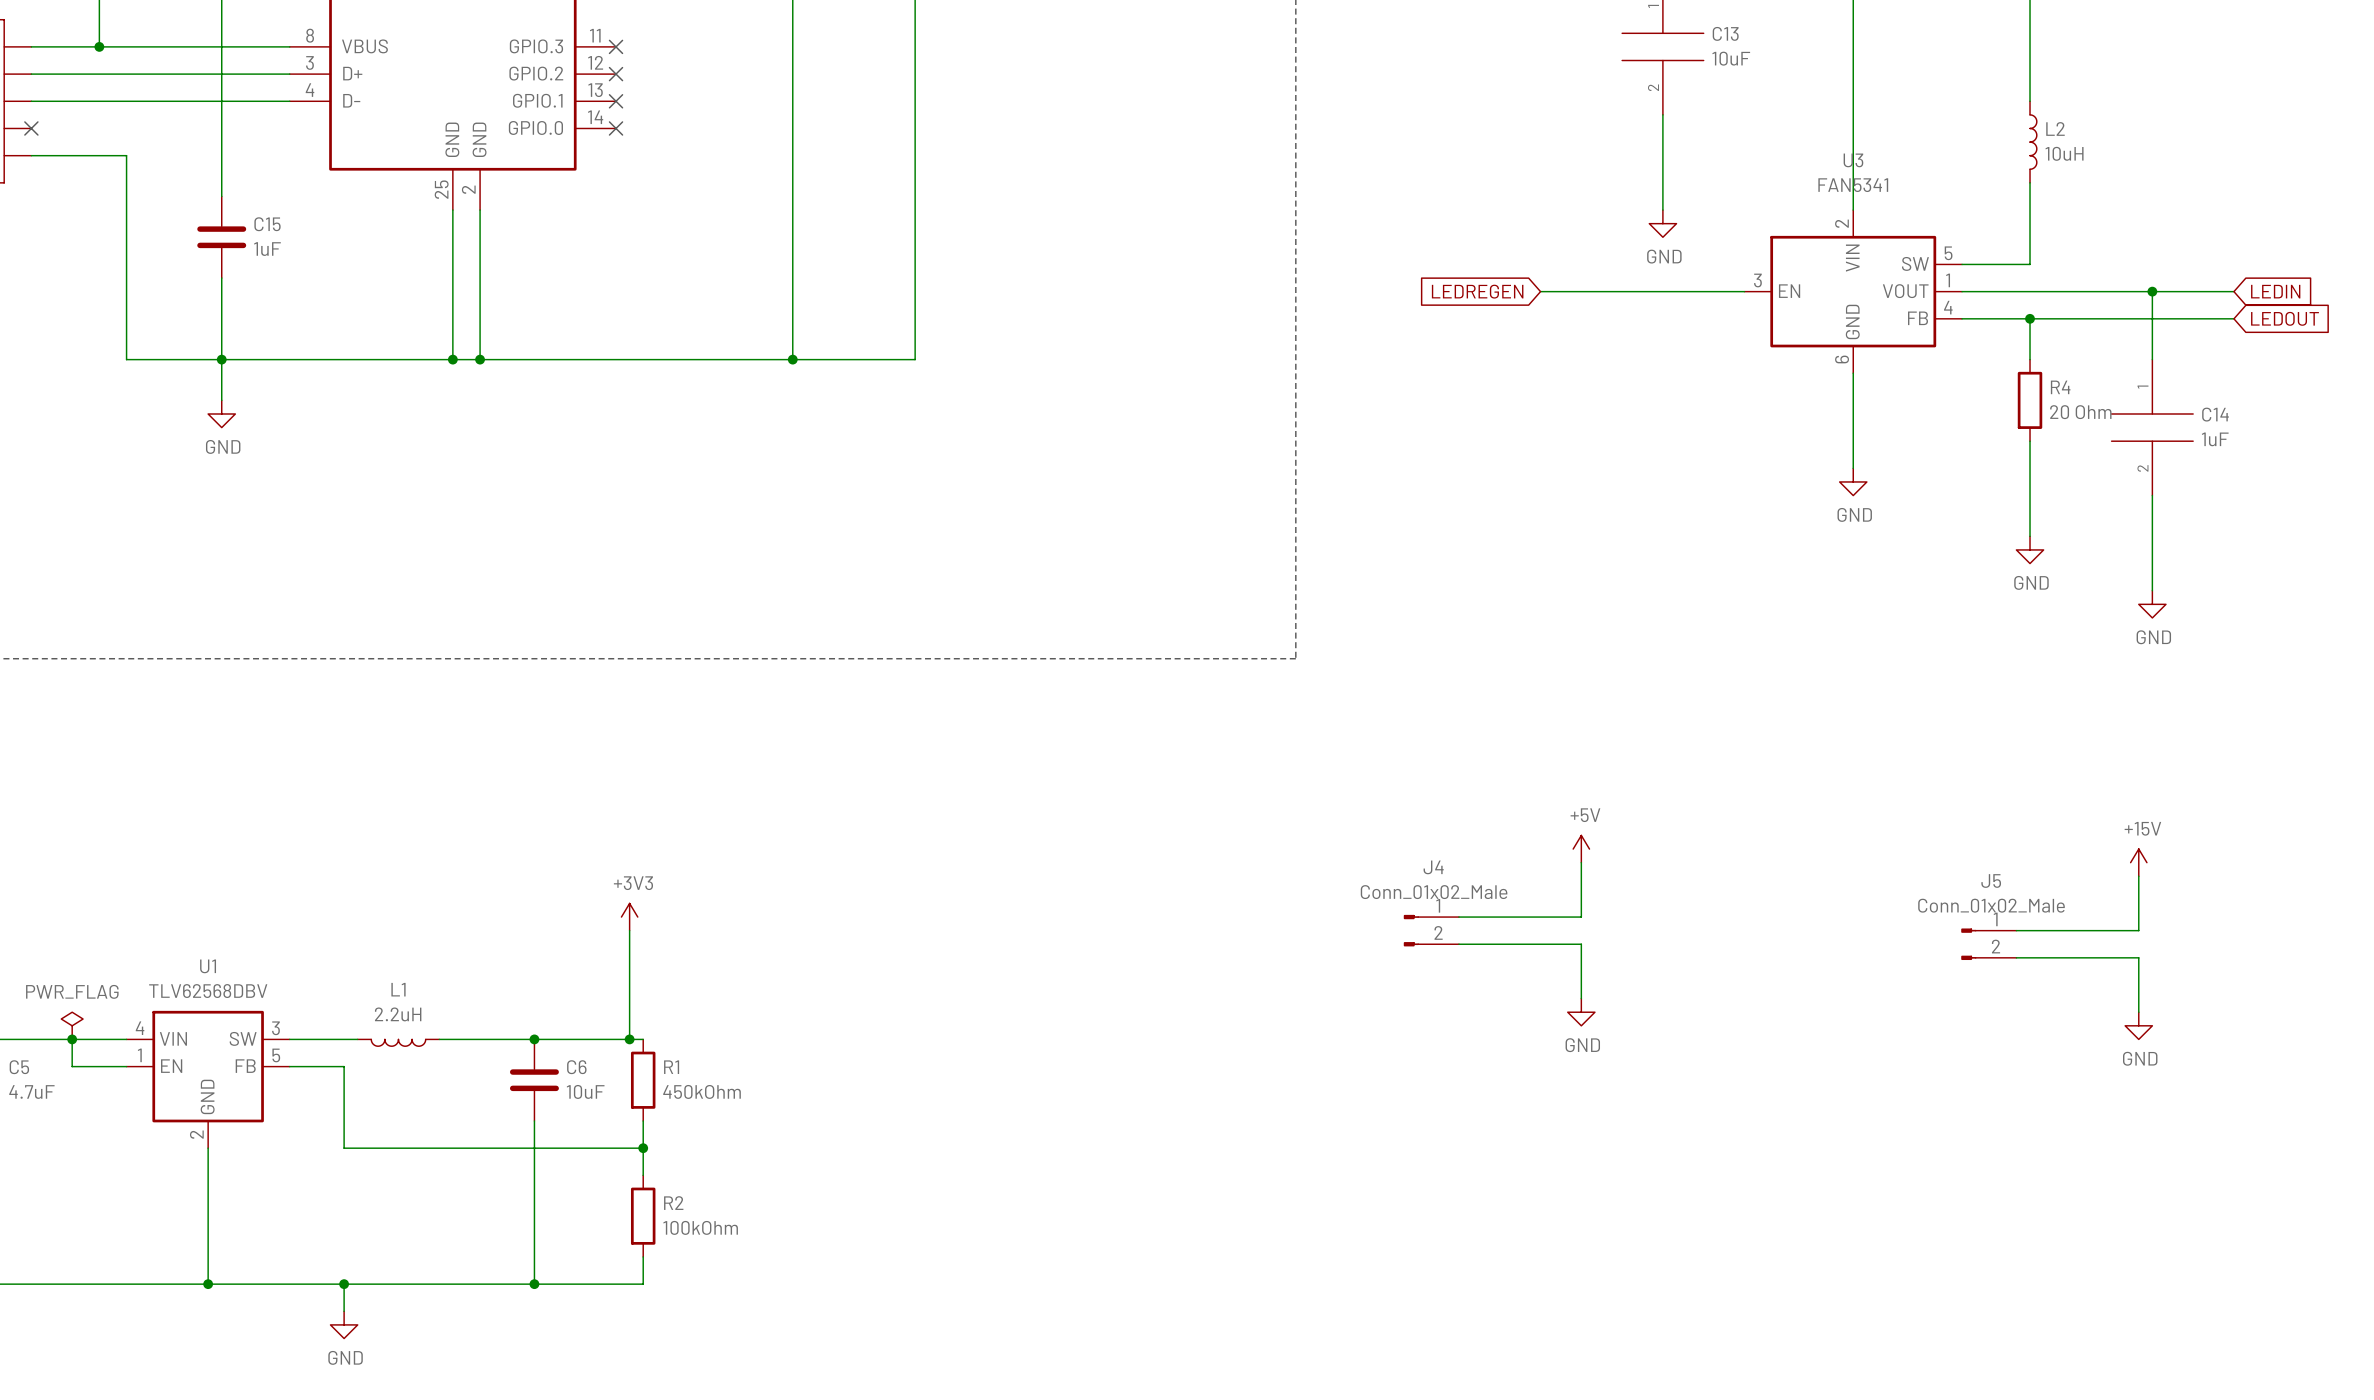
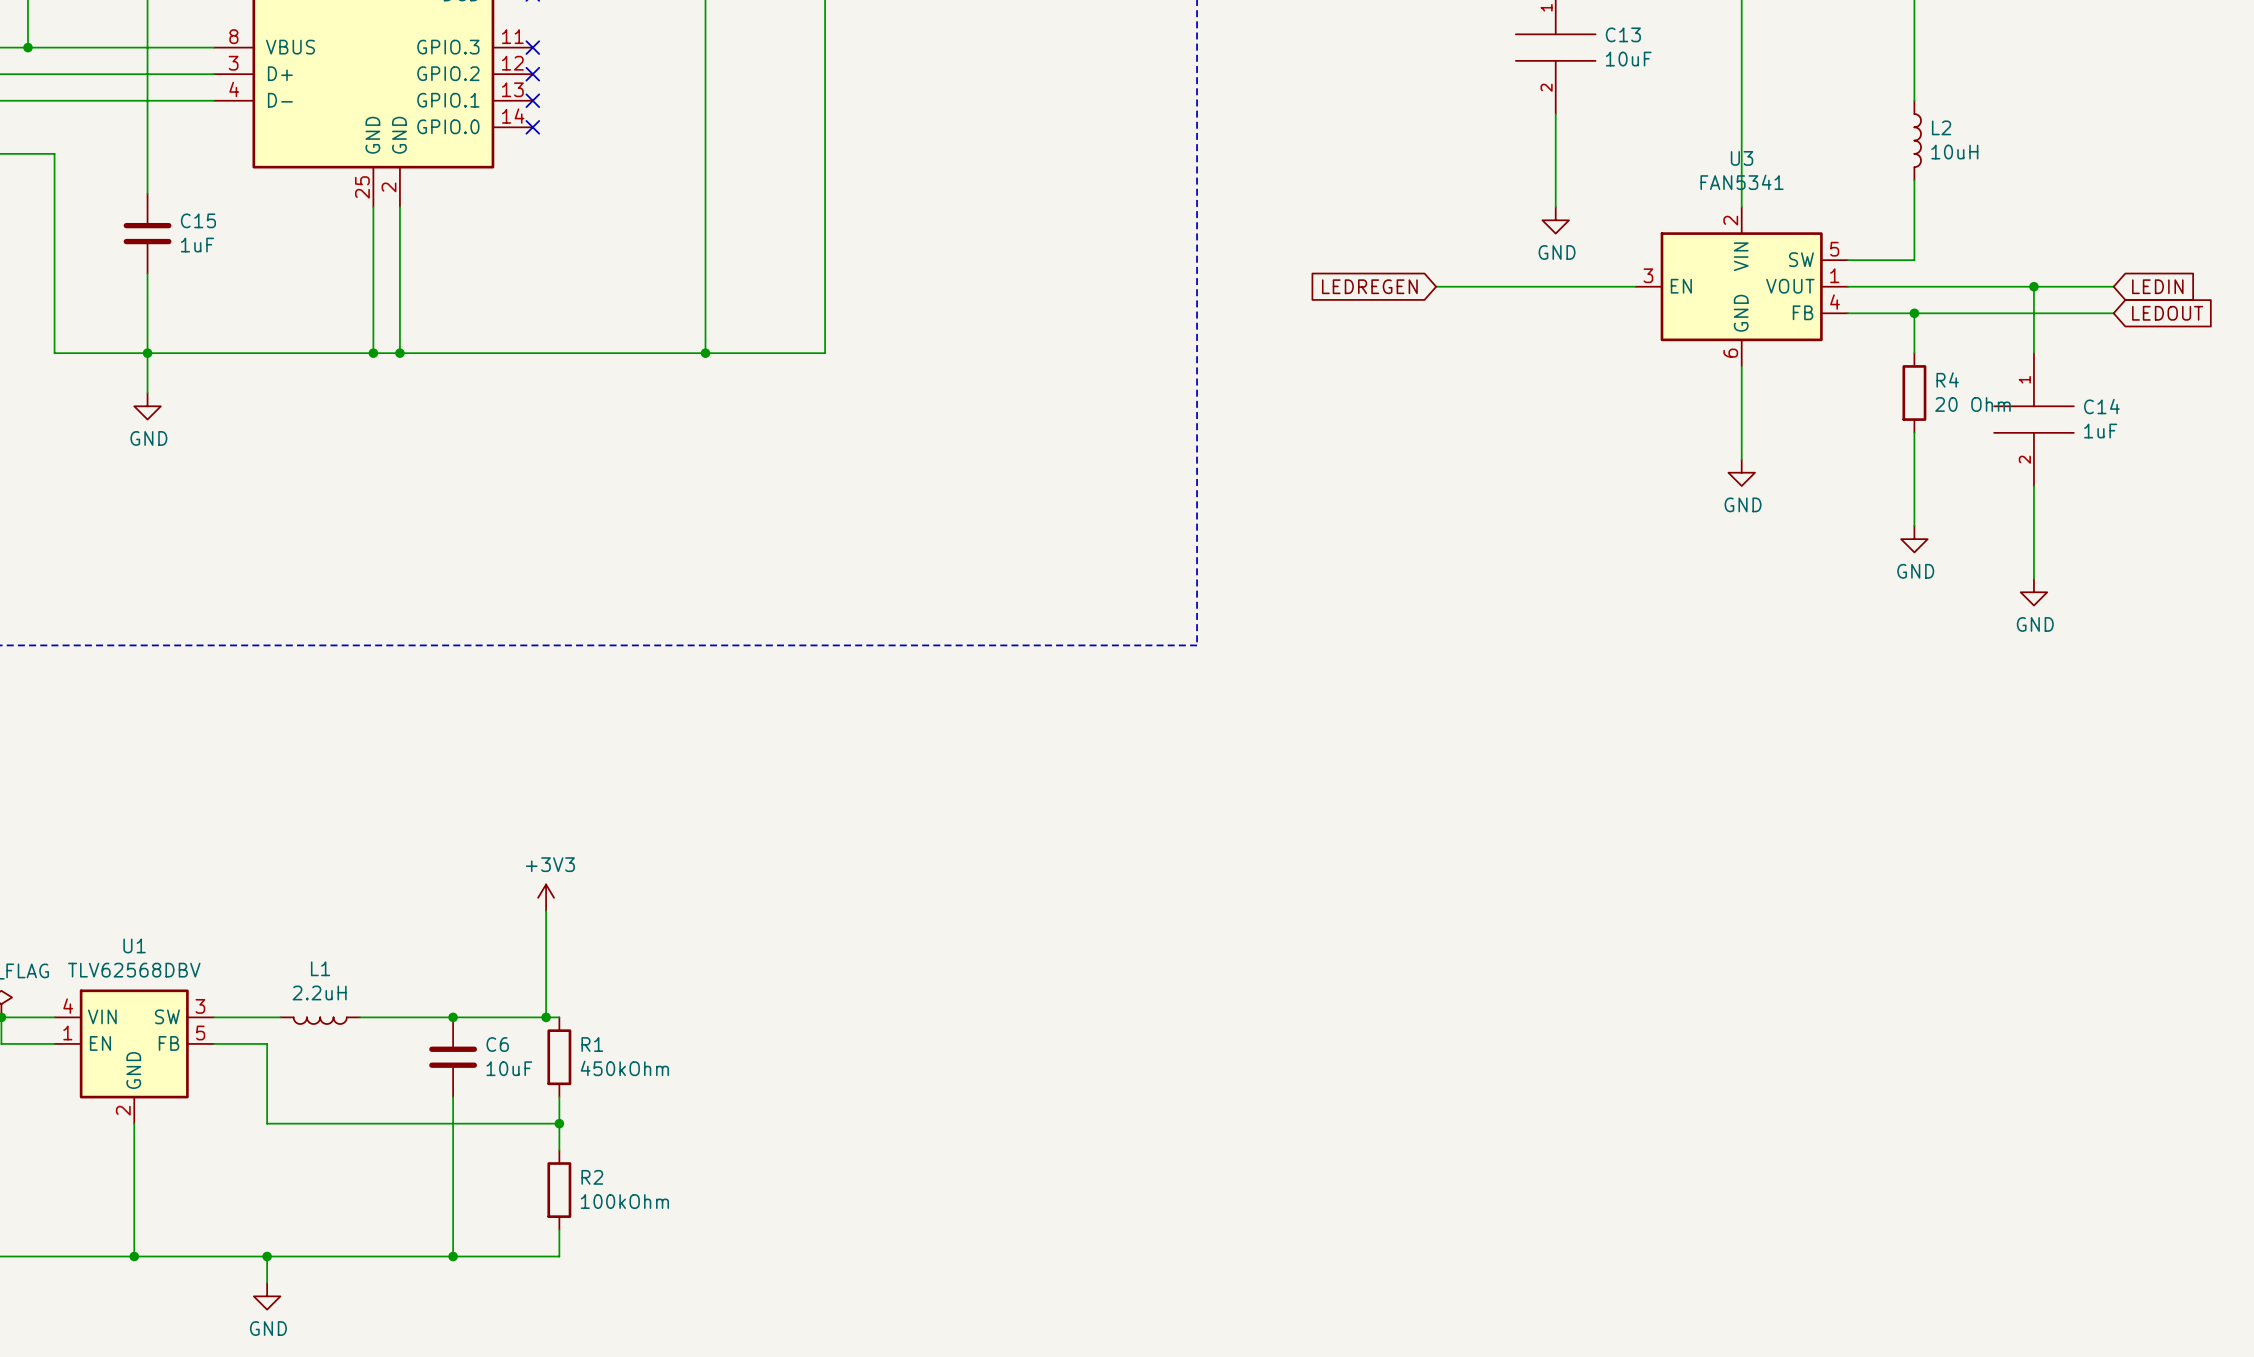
power symbol: +5V (1581, 849) -> none
wire: (1581, 862) (1581, 917) (1458, 917) -> none
power symbol: +15V (2138, 862) -> none
wire: (2138, 876) (2138, 930) (2016, 930) -> none
J4: Conn_01x02_Male (1431, 930) -> none
wire: (1458, 944) (1581, 944) (1581, 998) -> none
J5: Conn_01x02_Male (1988, 944) -> none
wire: (2016, 957) (2138, 957) (2138, 1012) -> none
power symbol: GND (1581, 1012) -> none
power symbol: GND (2138, 1025) -> none

